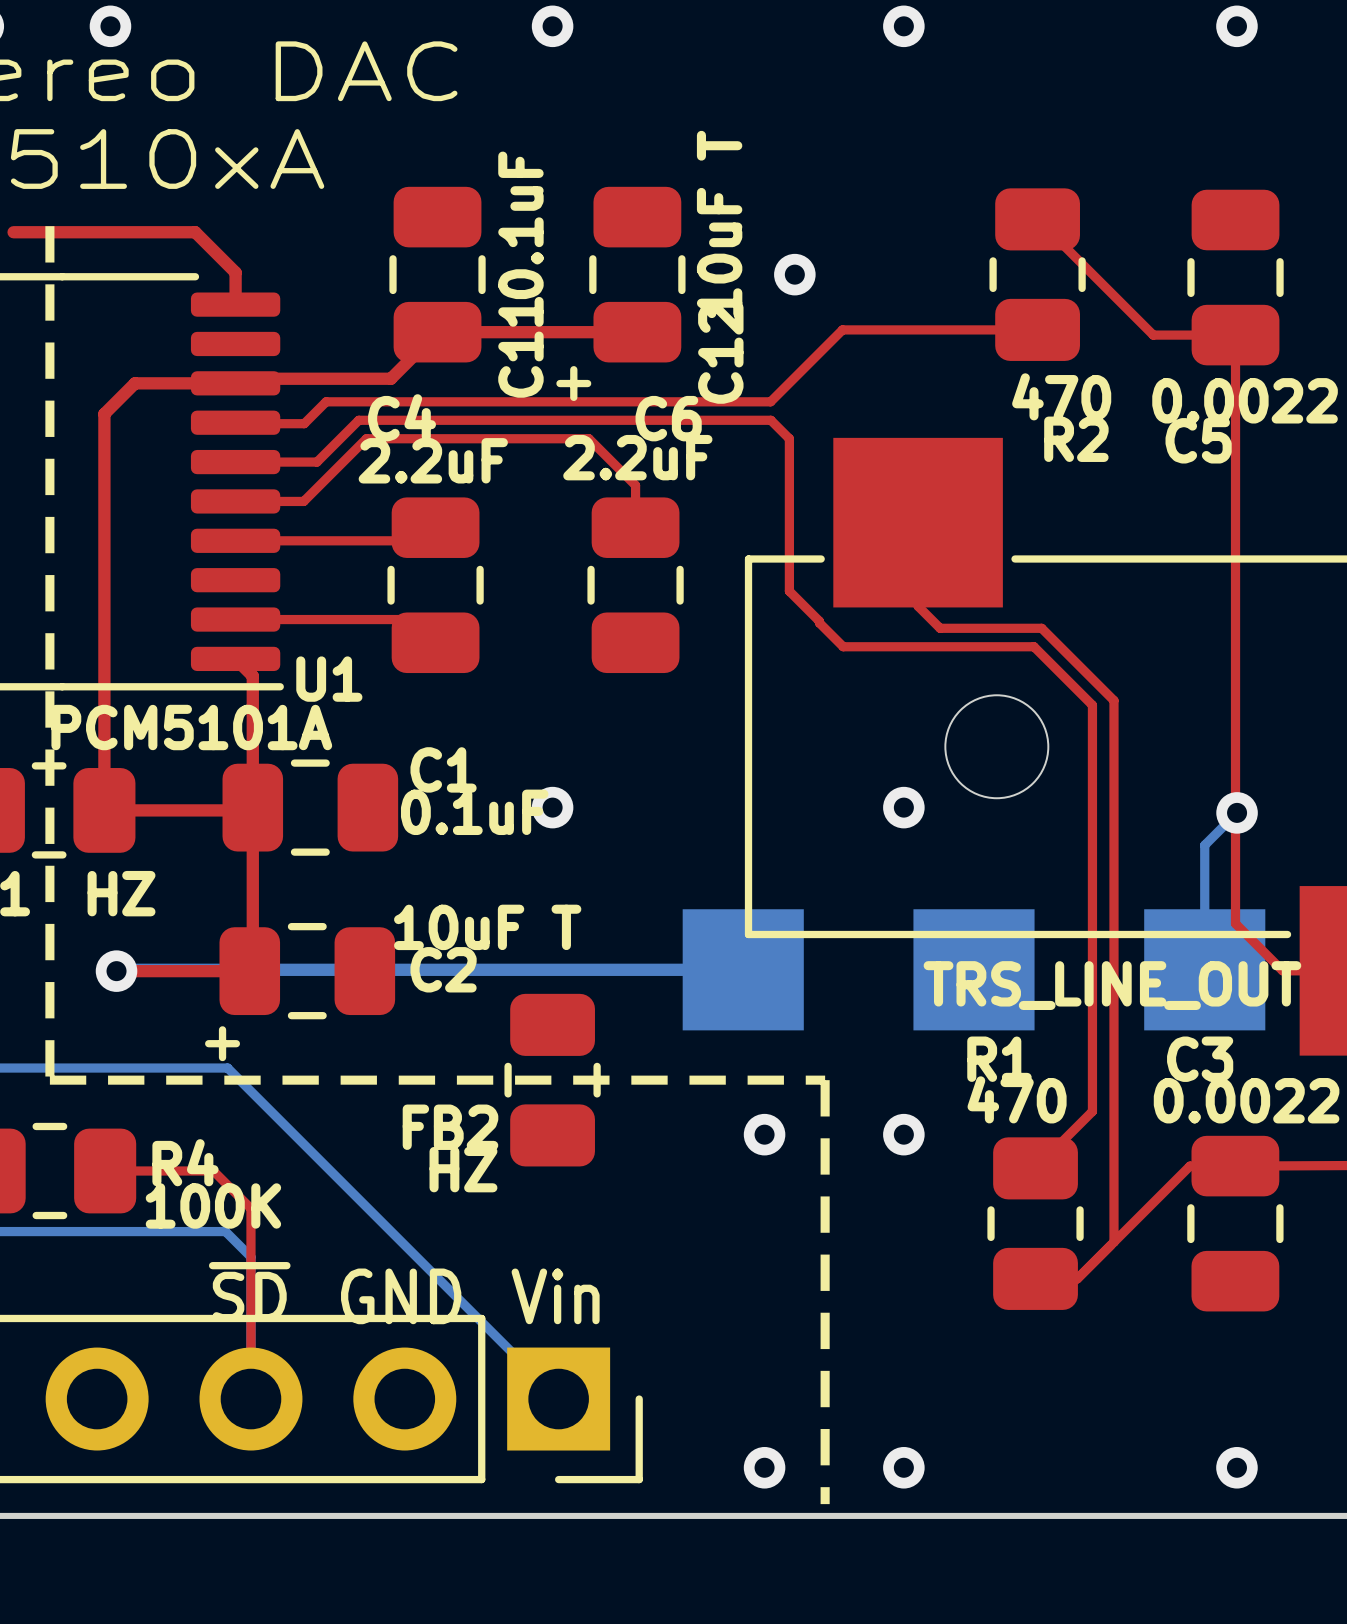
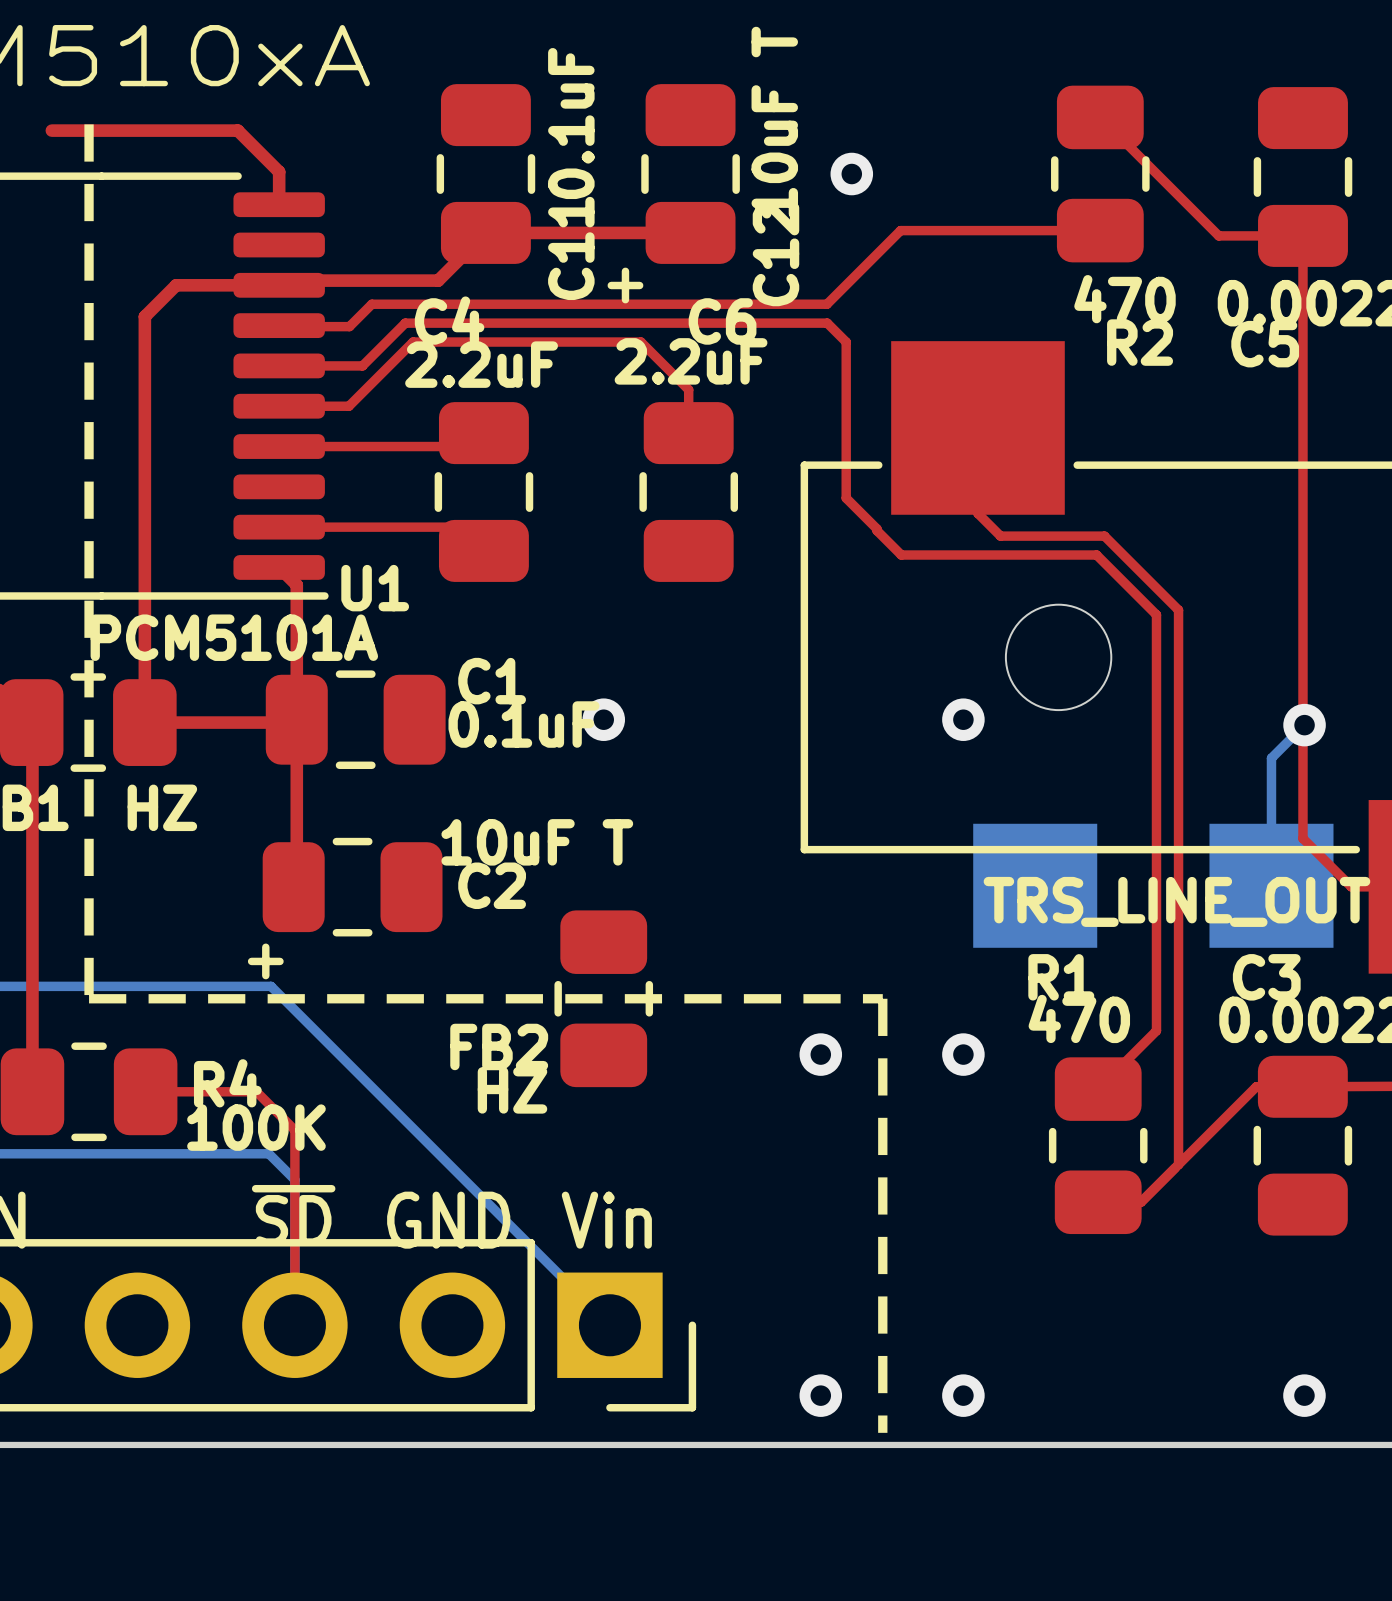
bottom track: (743, 969) (116, 971) -> none
part: (743, 969) -> none
top track: (116, 971) (249, 971) -> none
via: (116, 971) -> none

